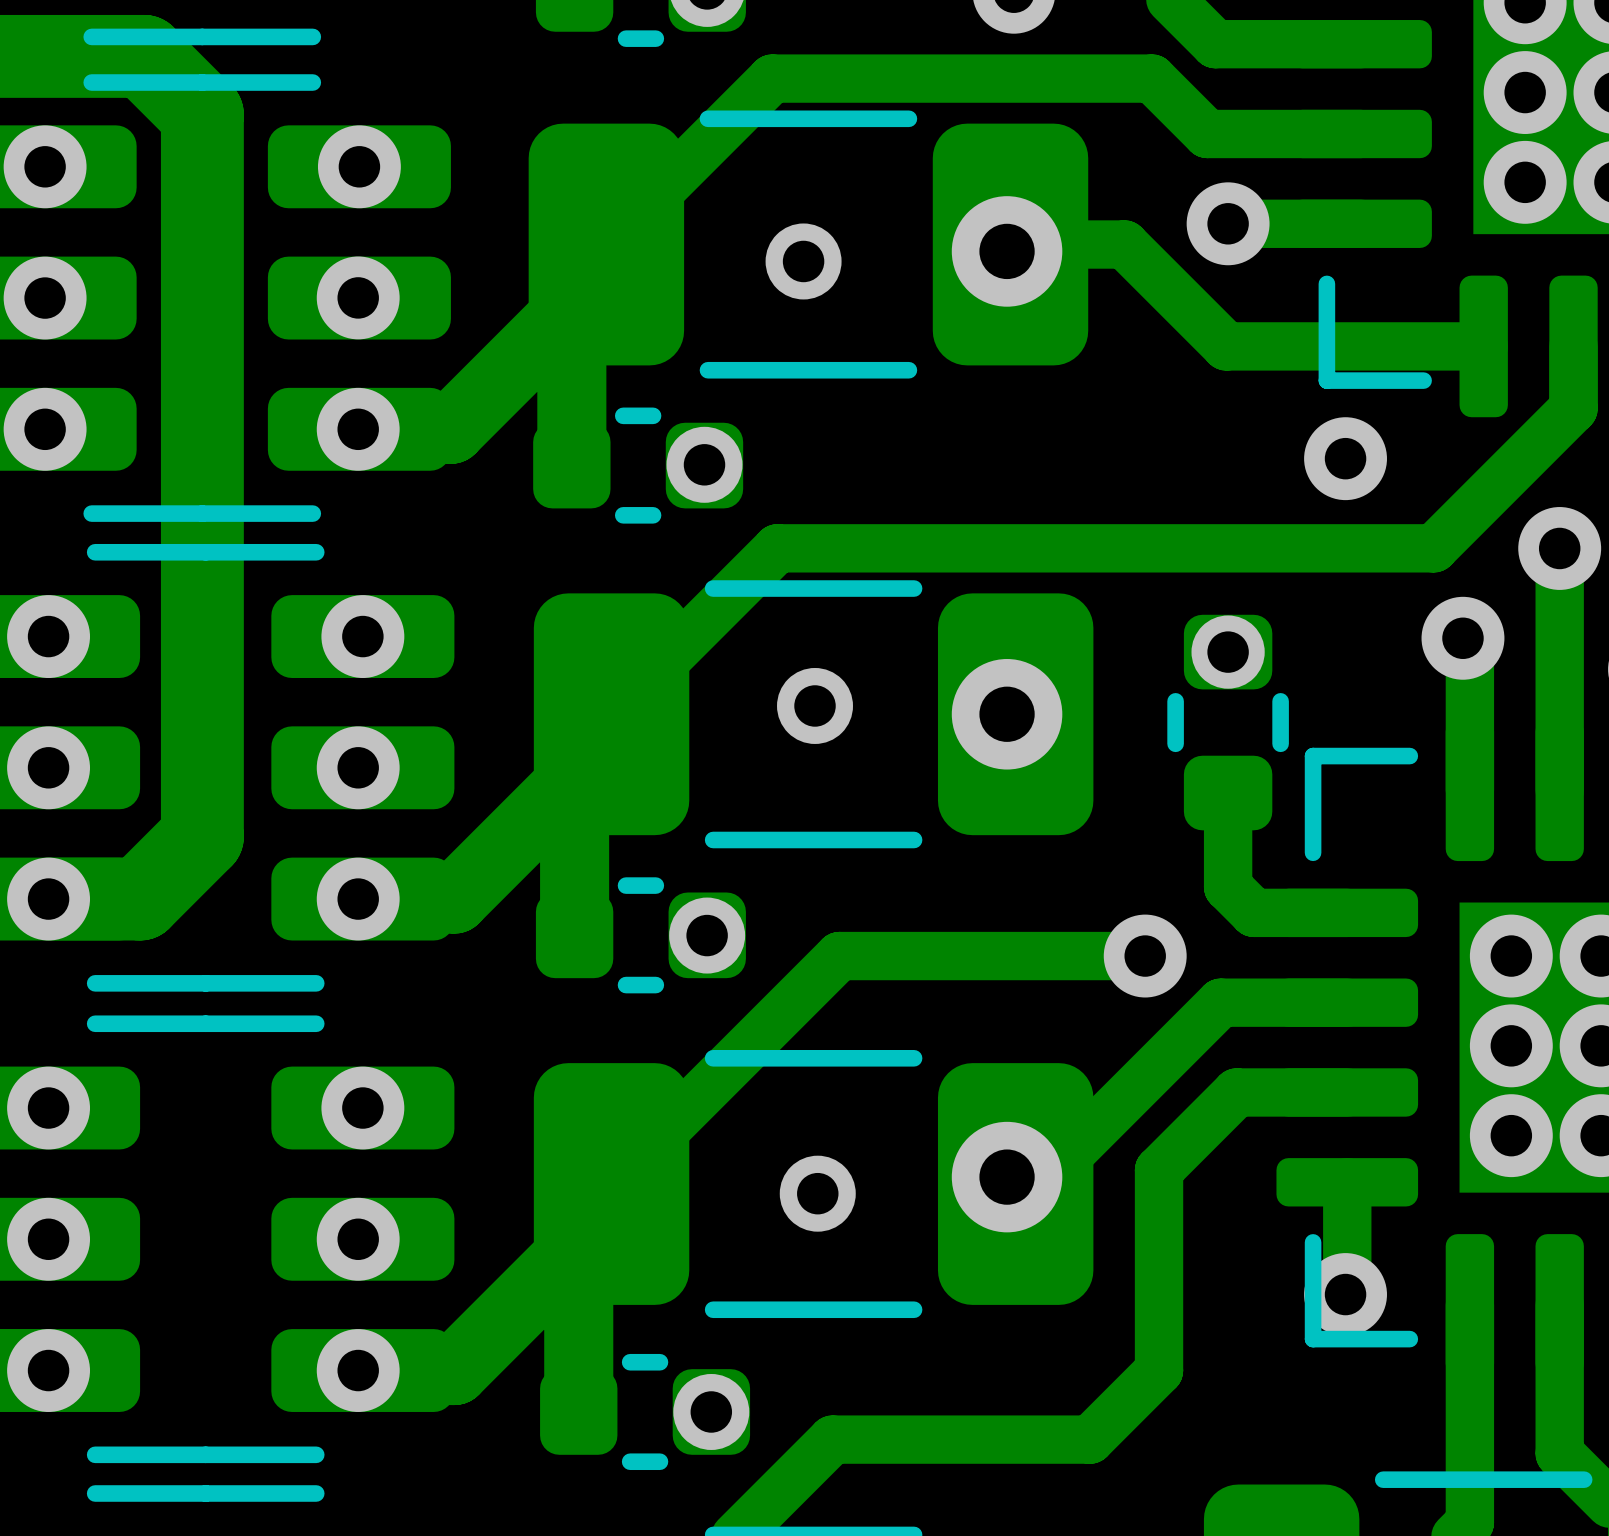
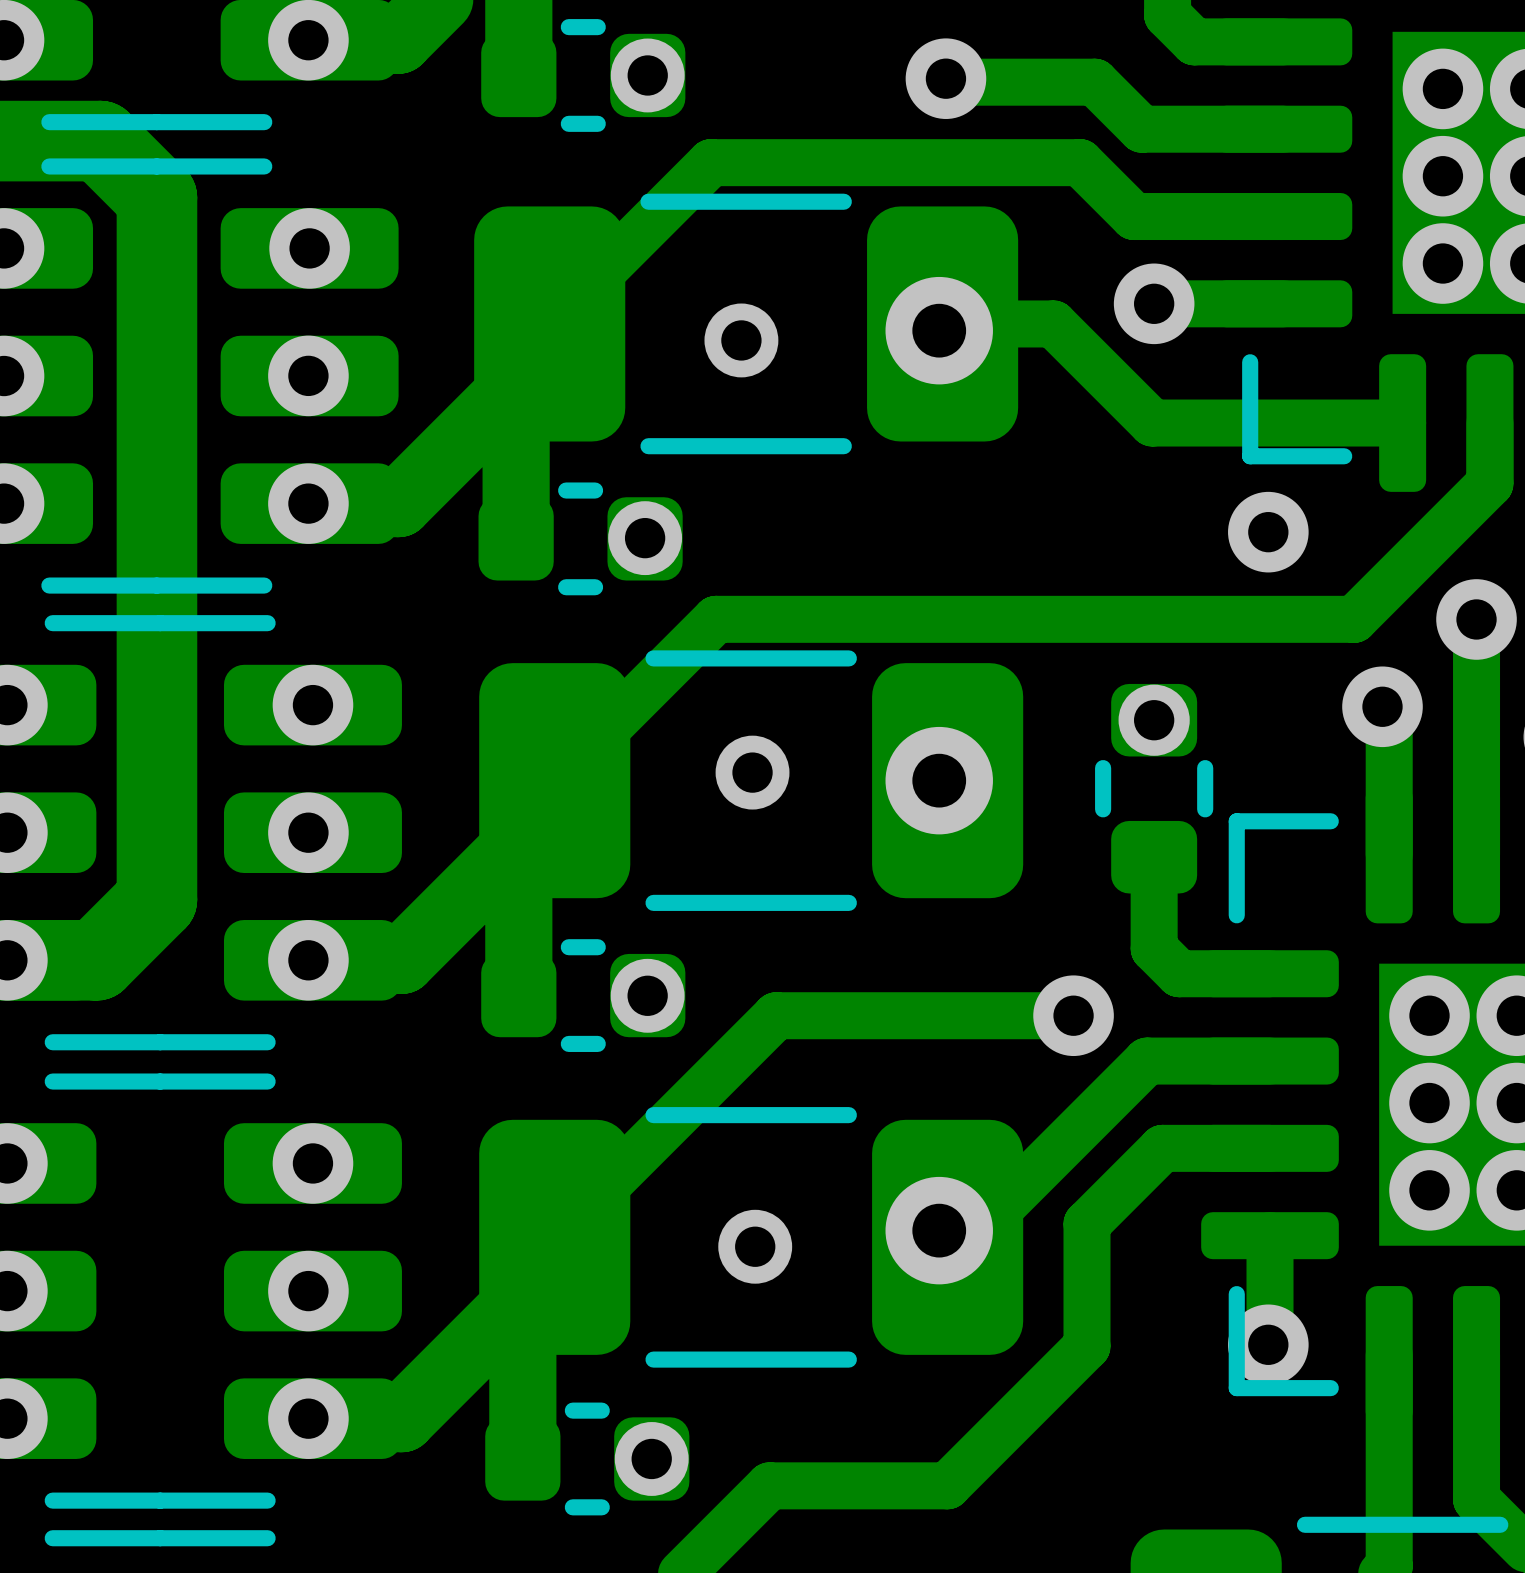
track: (1159, 1295) (1159, 1370) (1089, 1439) (1015, 1439) -> (1086, 1346) (947, 1485)

